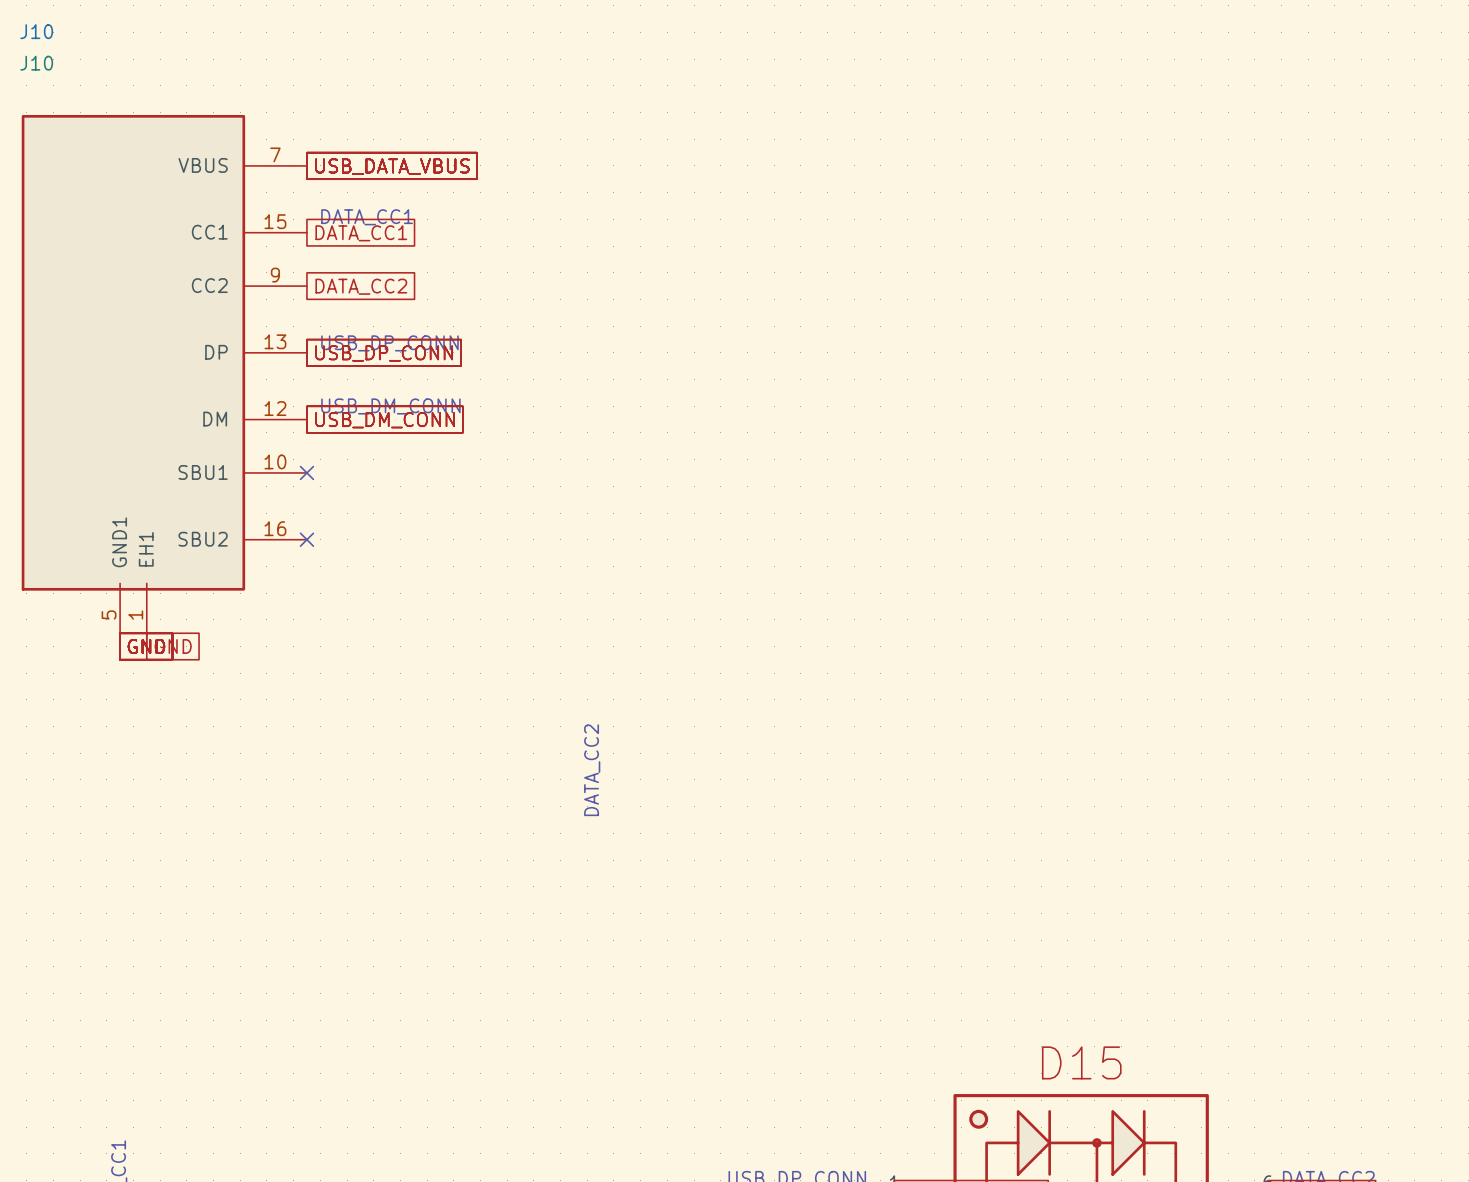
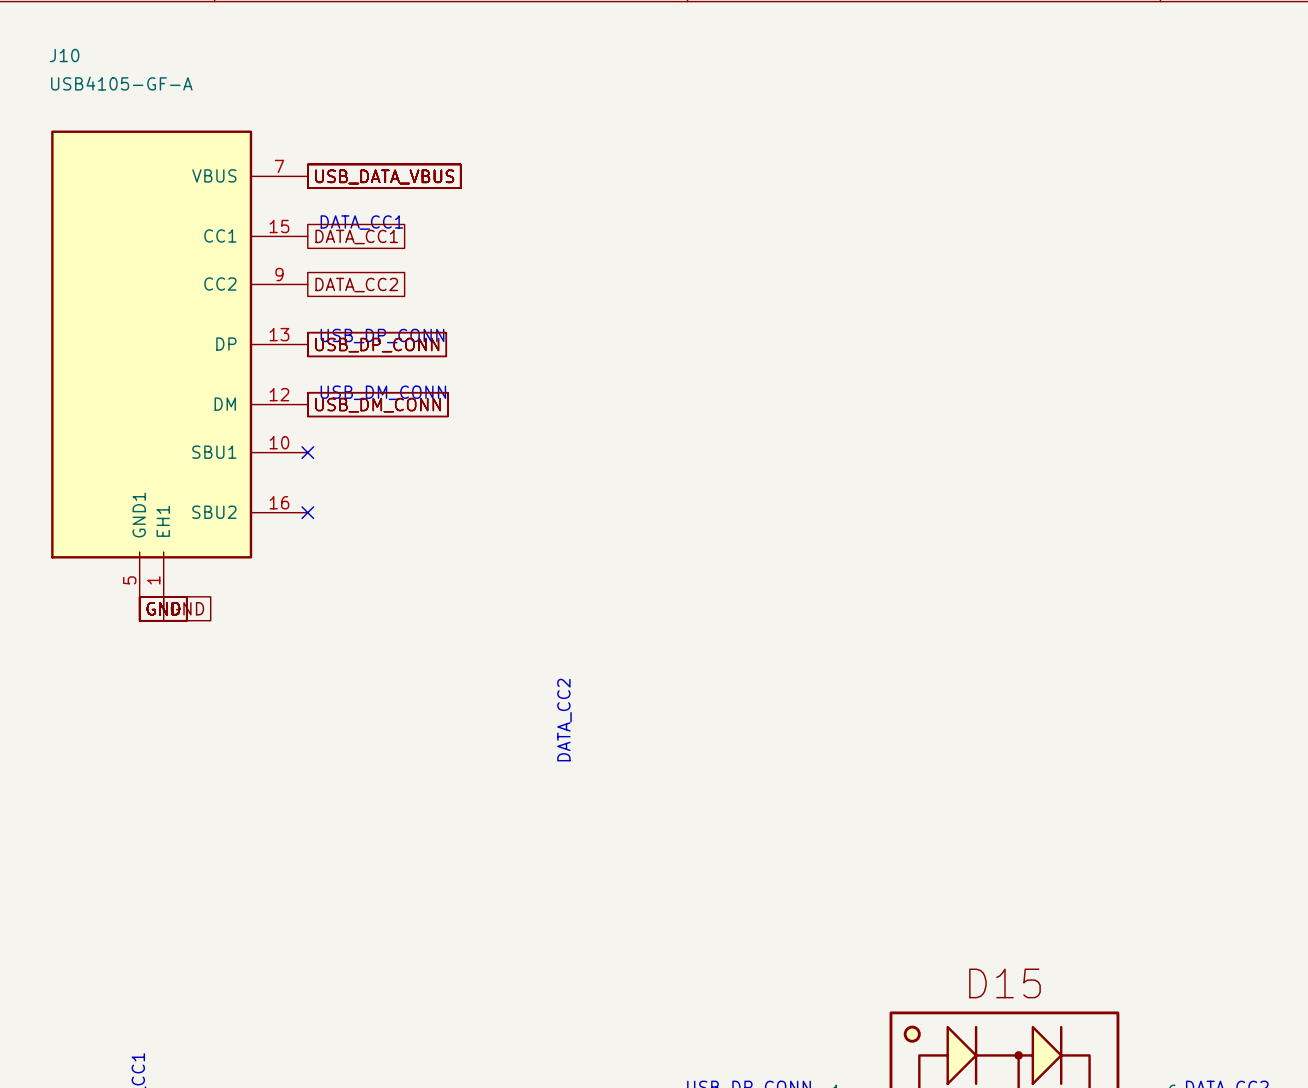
J10 value: J10 (36, 63) -> USB4105-GF-A (121, 83)

